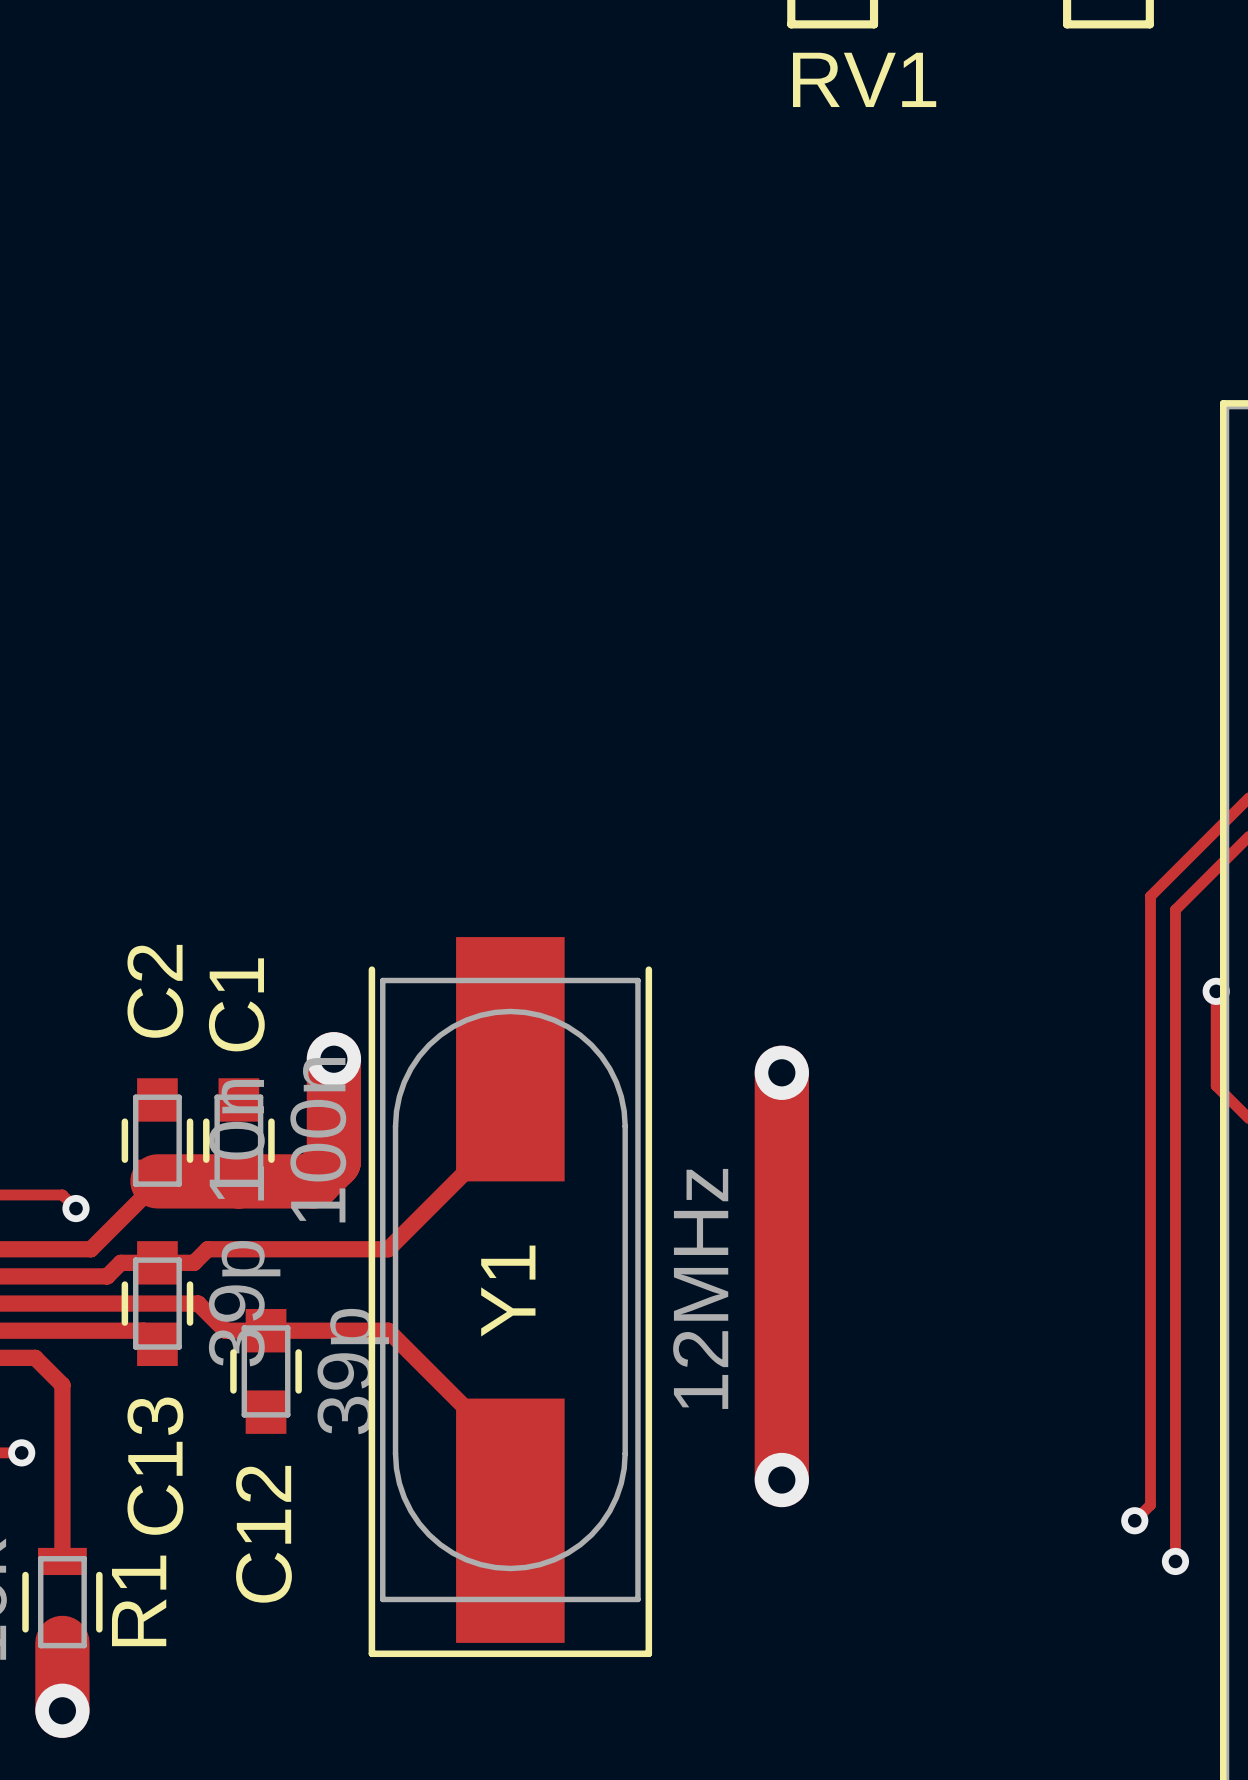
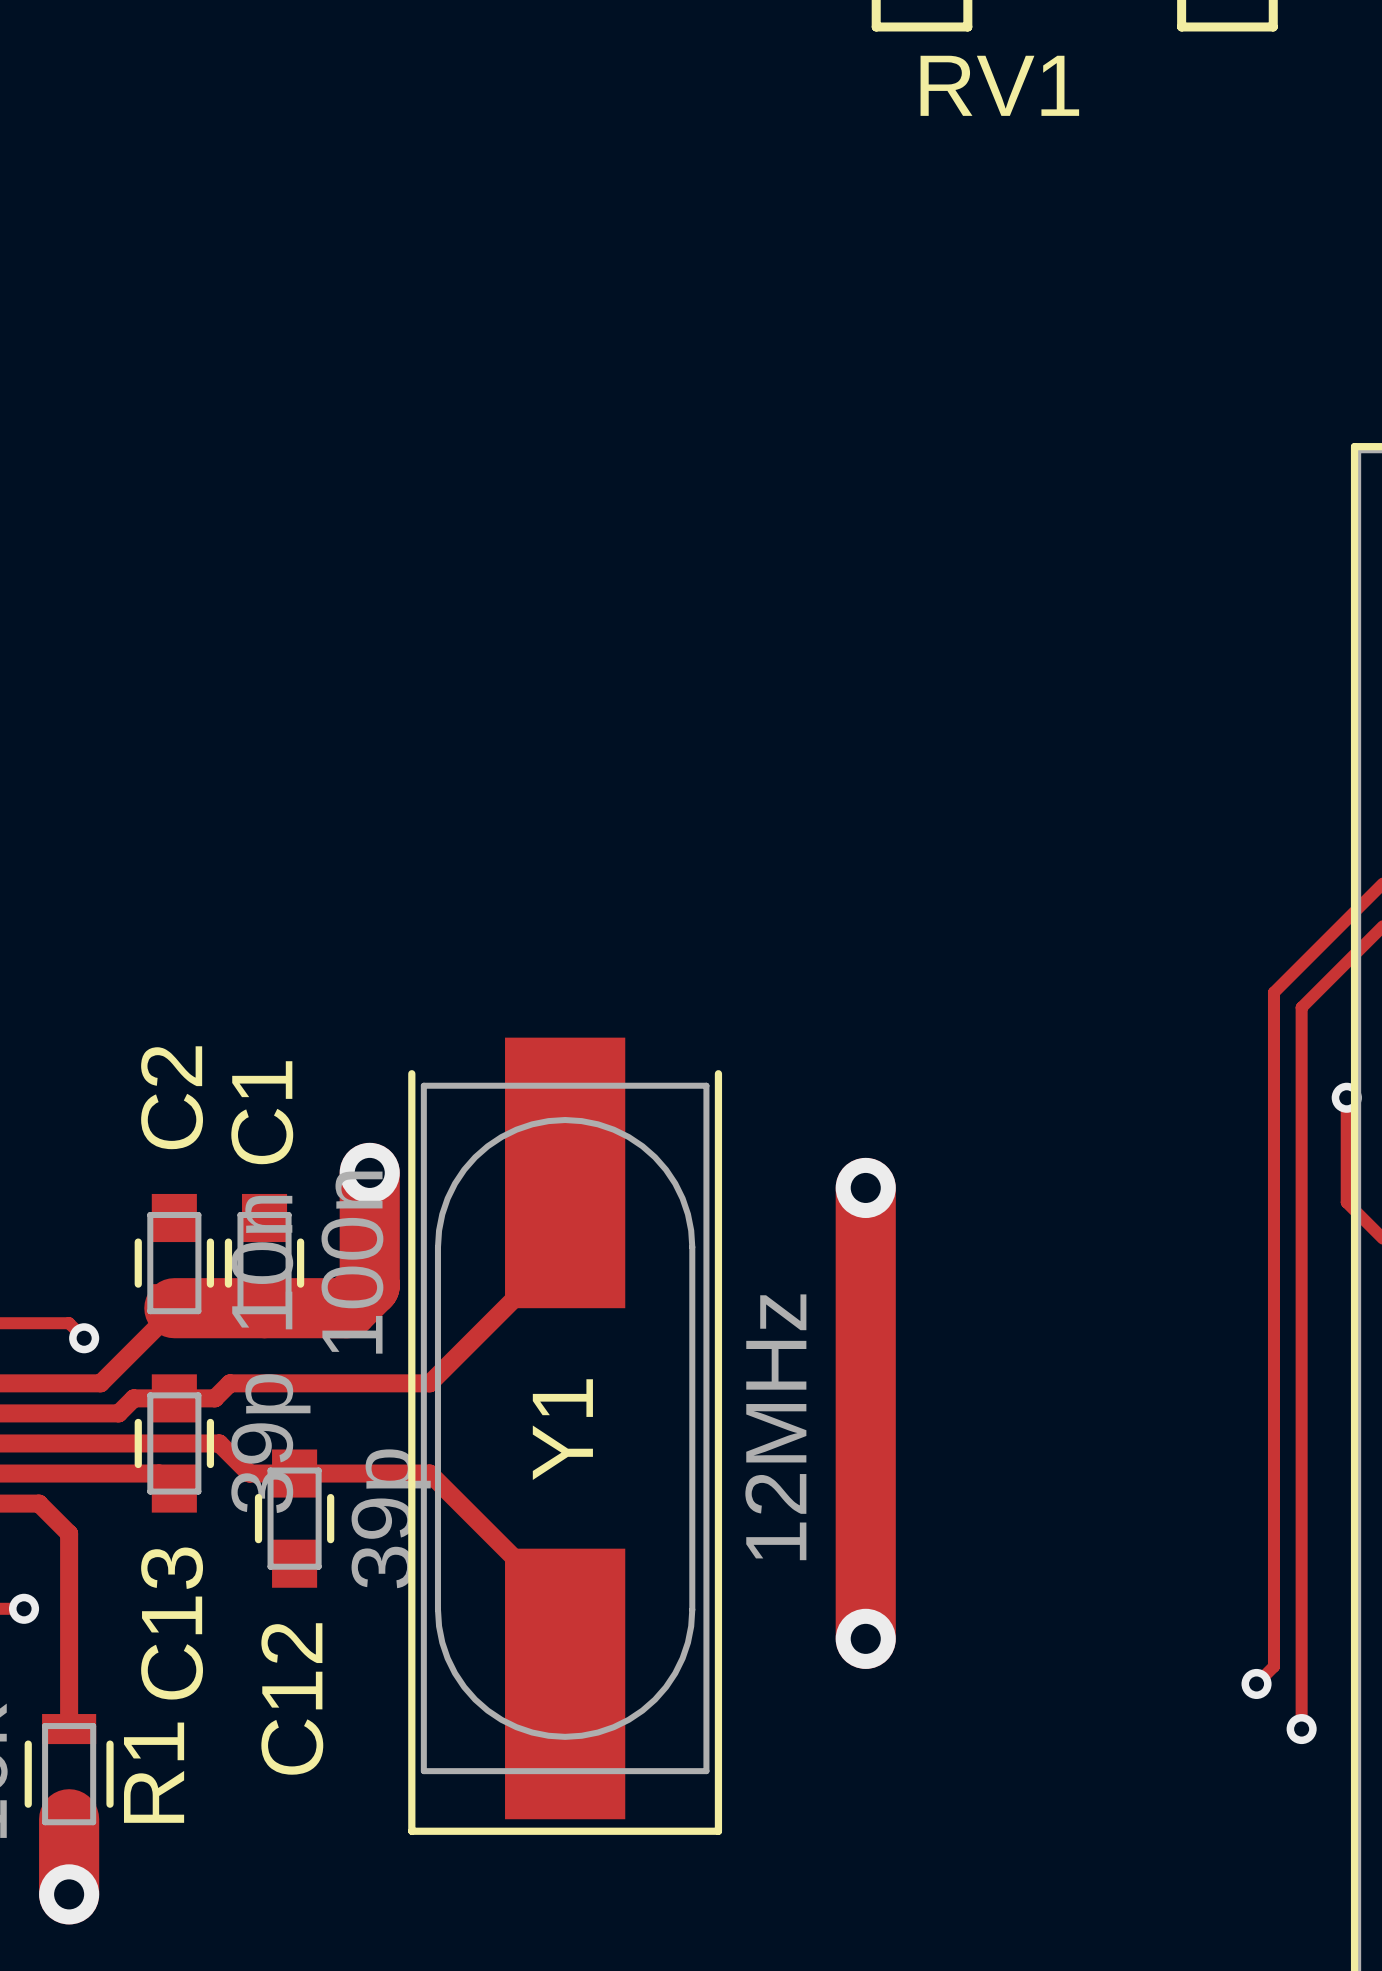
RV1 name position: RV1 (864, 79) -> RV1 (999, 85)

